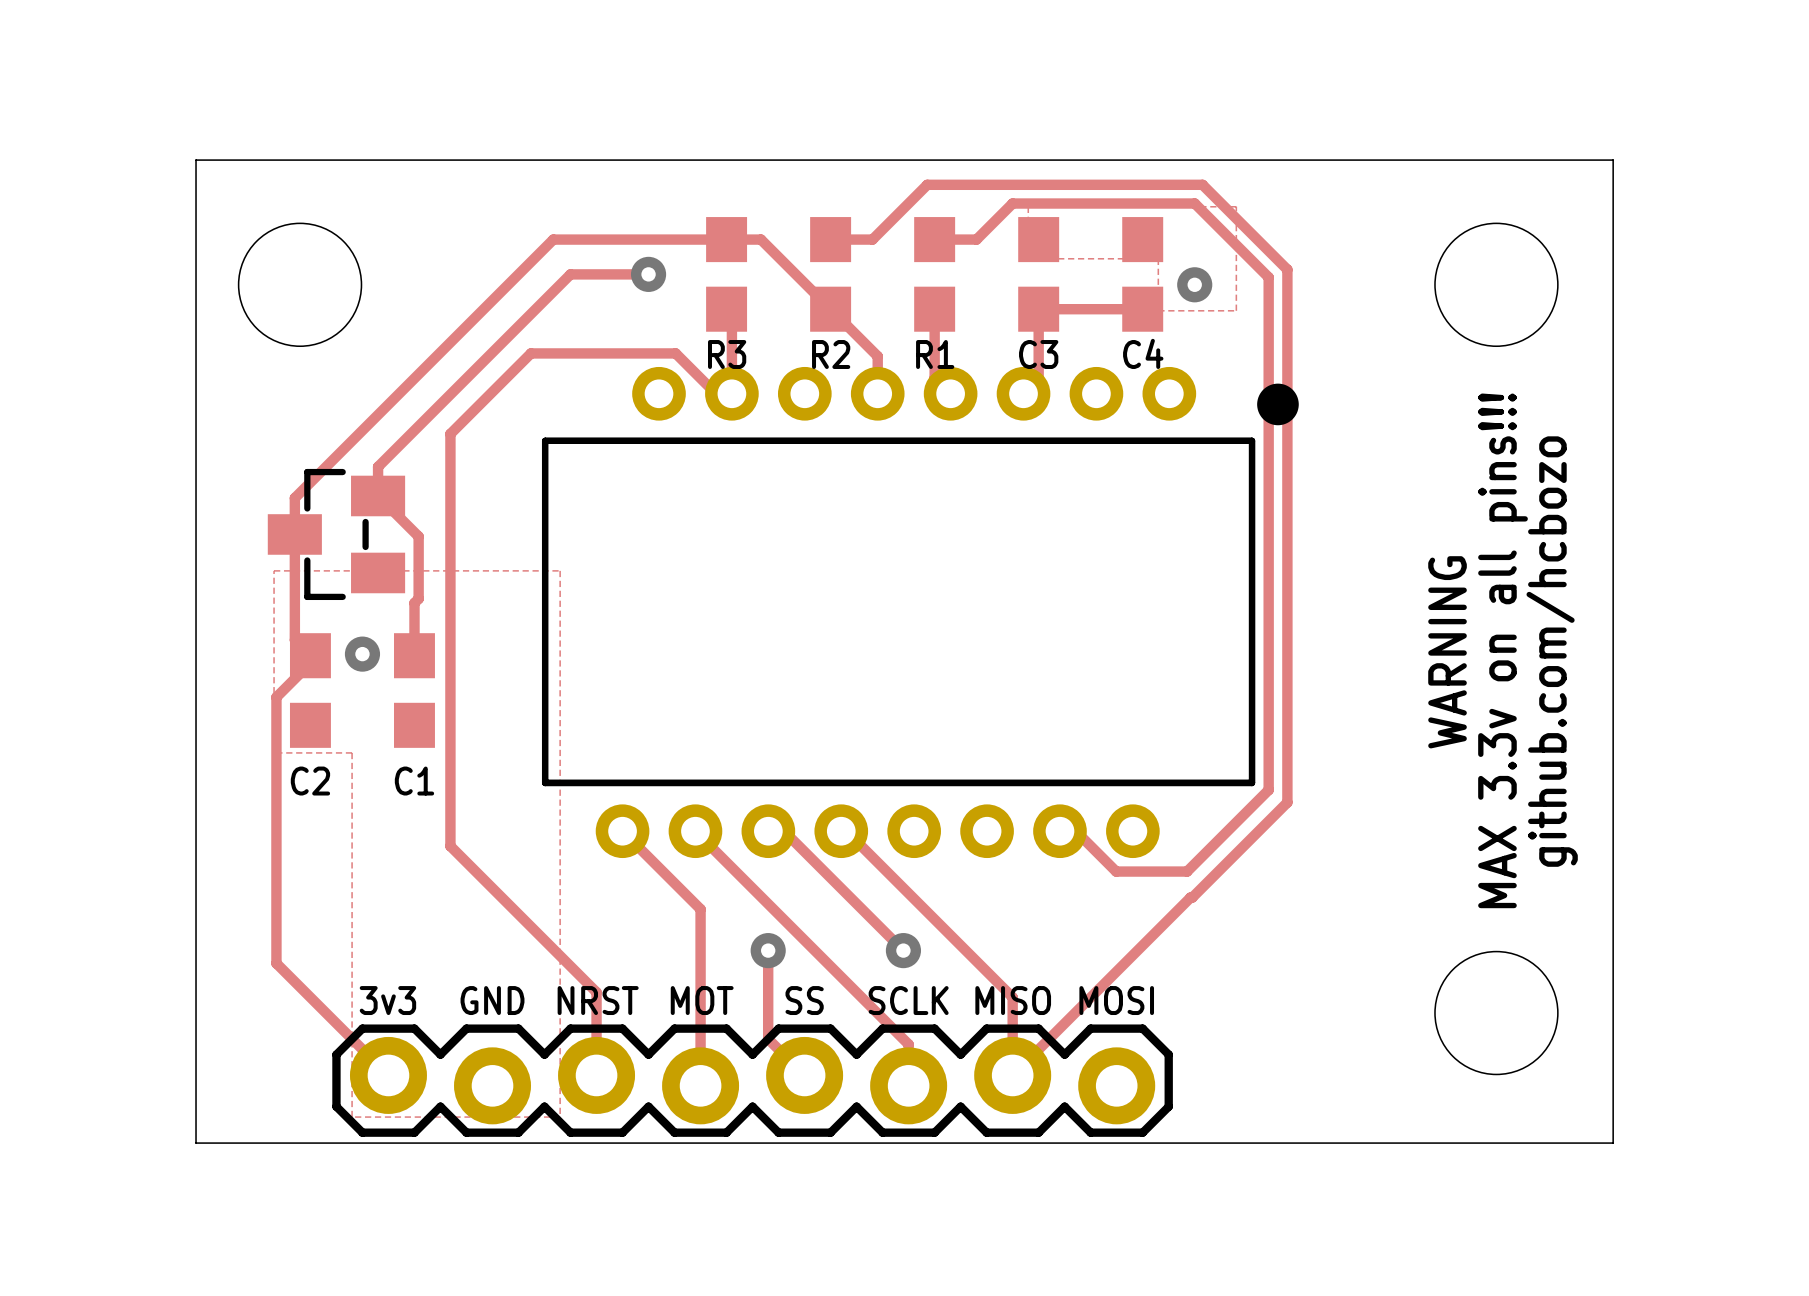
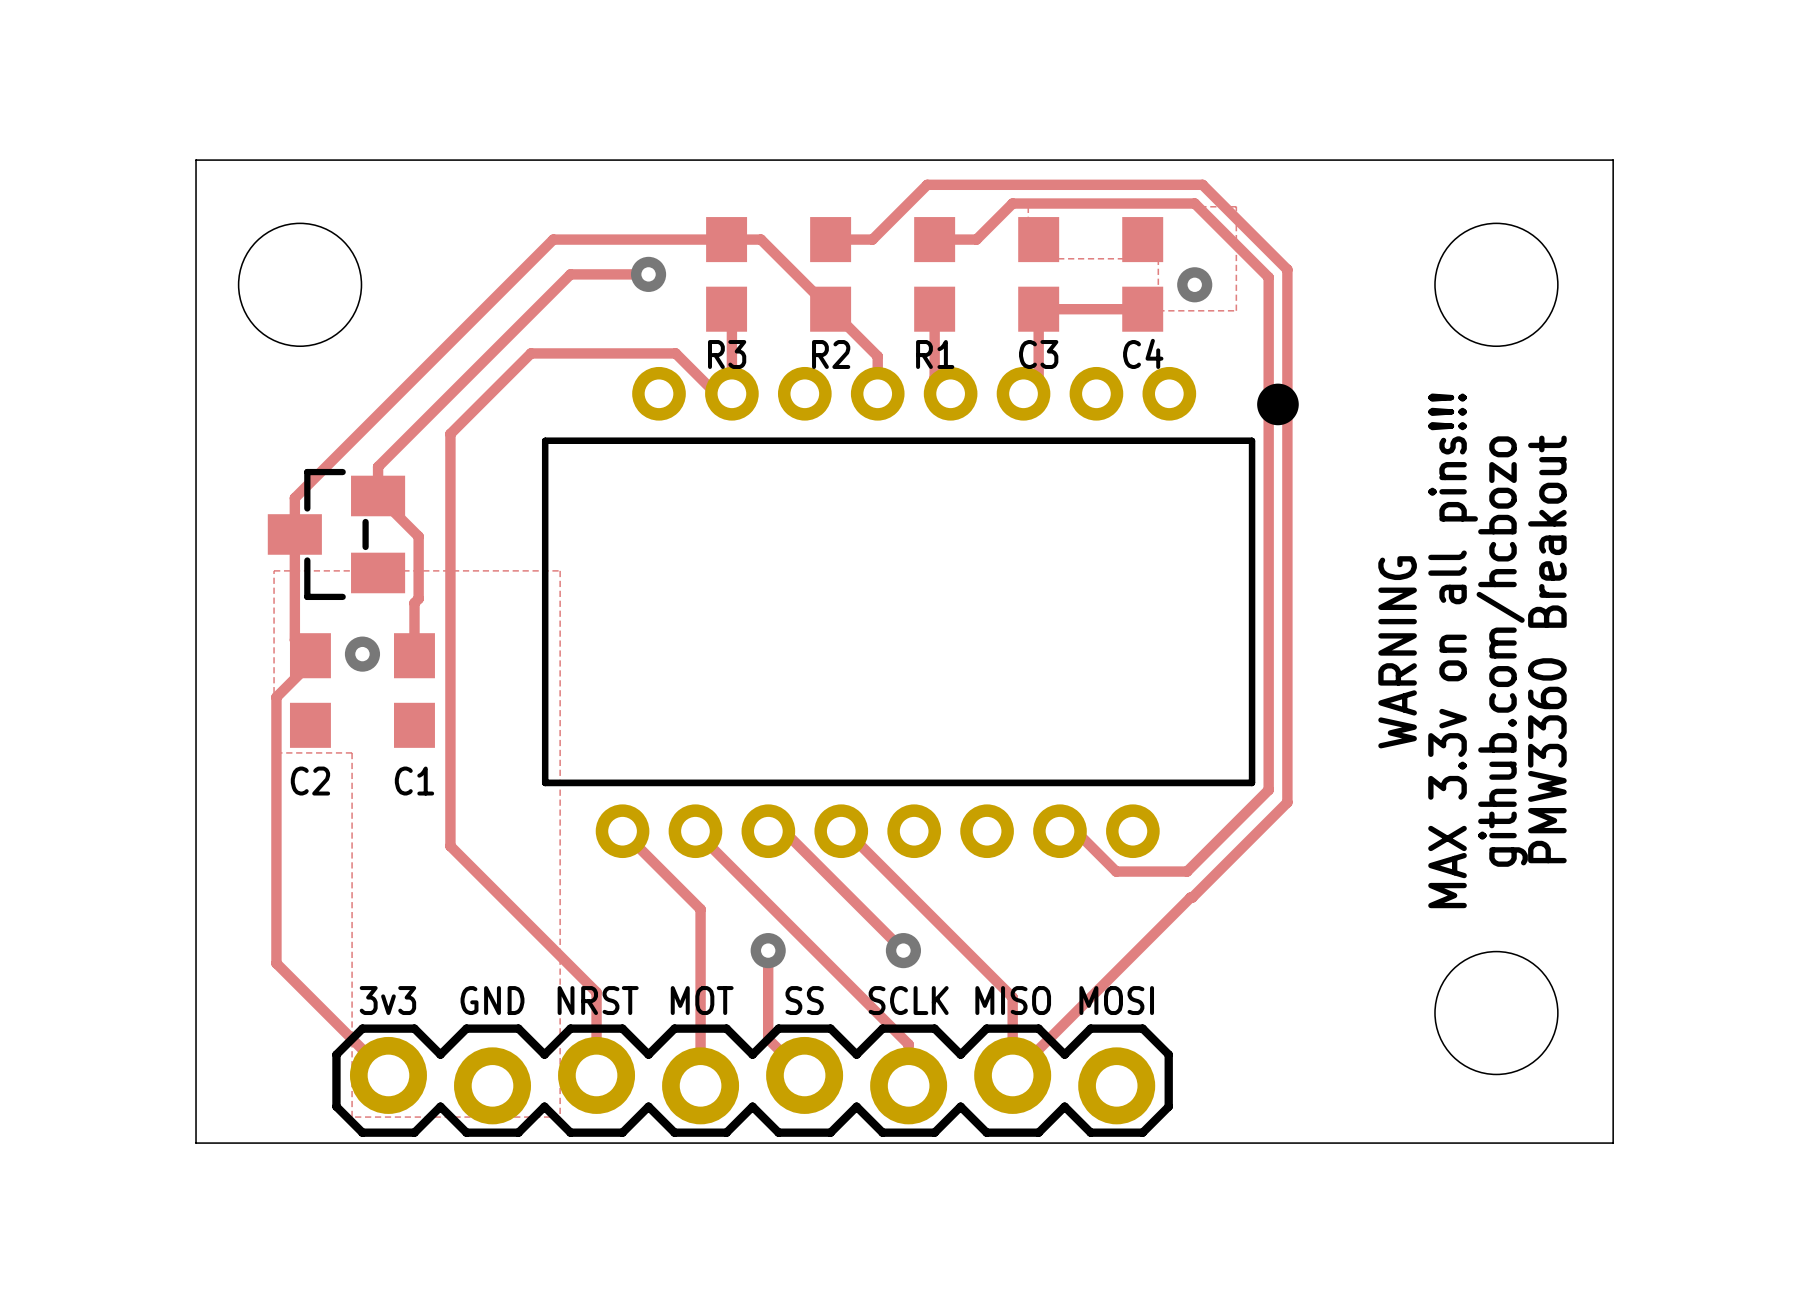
text: MAX 3.3v on all pins!!! (1503, 650) -> github.com/hcbozo (1502, 651)
text: github.com/hcbozo (1552, 651) -> PMW3360 Breakout (1547, 649)
text: none -> WARNING (1397, 652)
text: WARNING (1447, 652) -> MAX 3.3v on all pins!!! (1453, 650)

